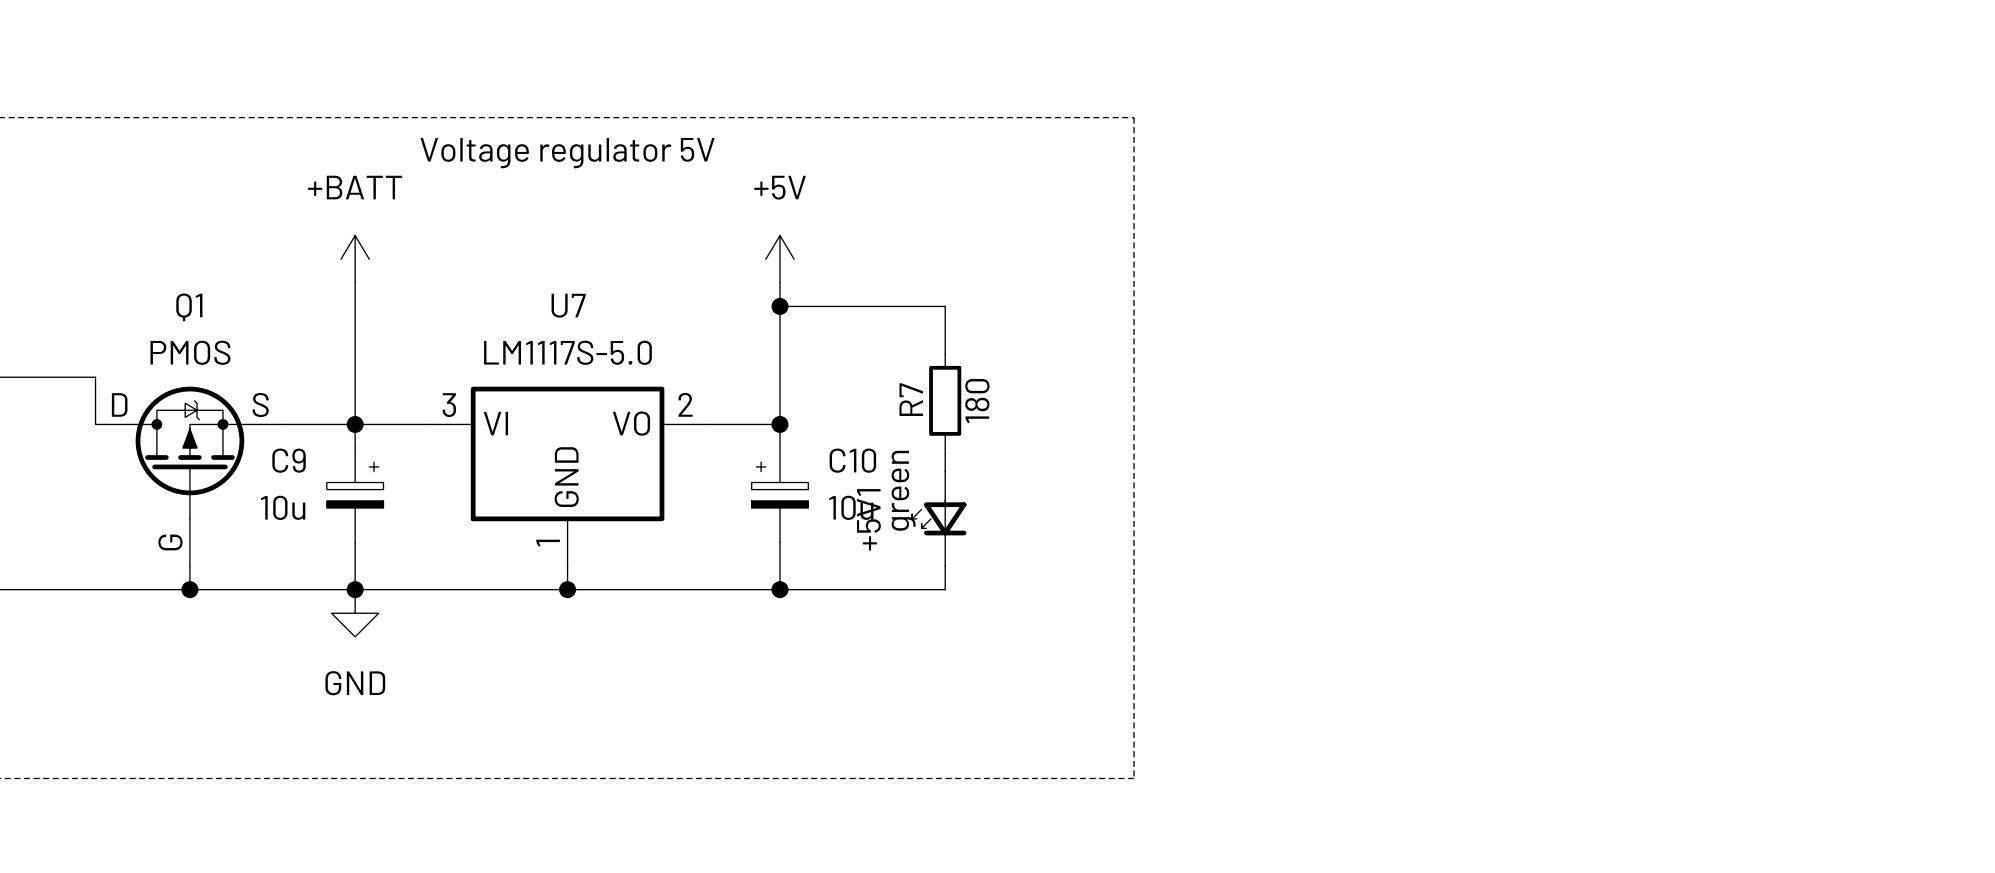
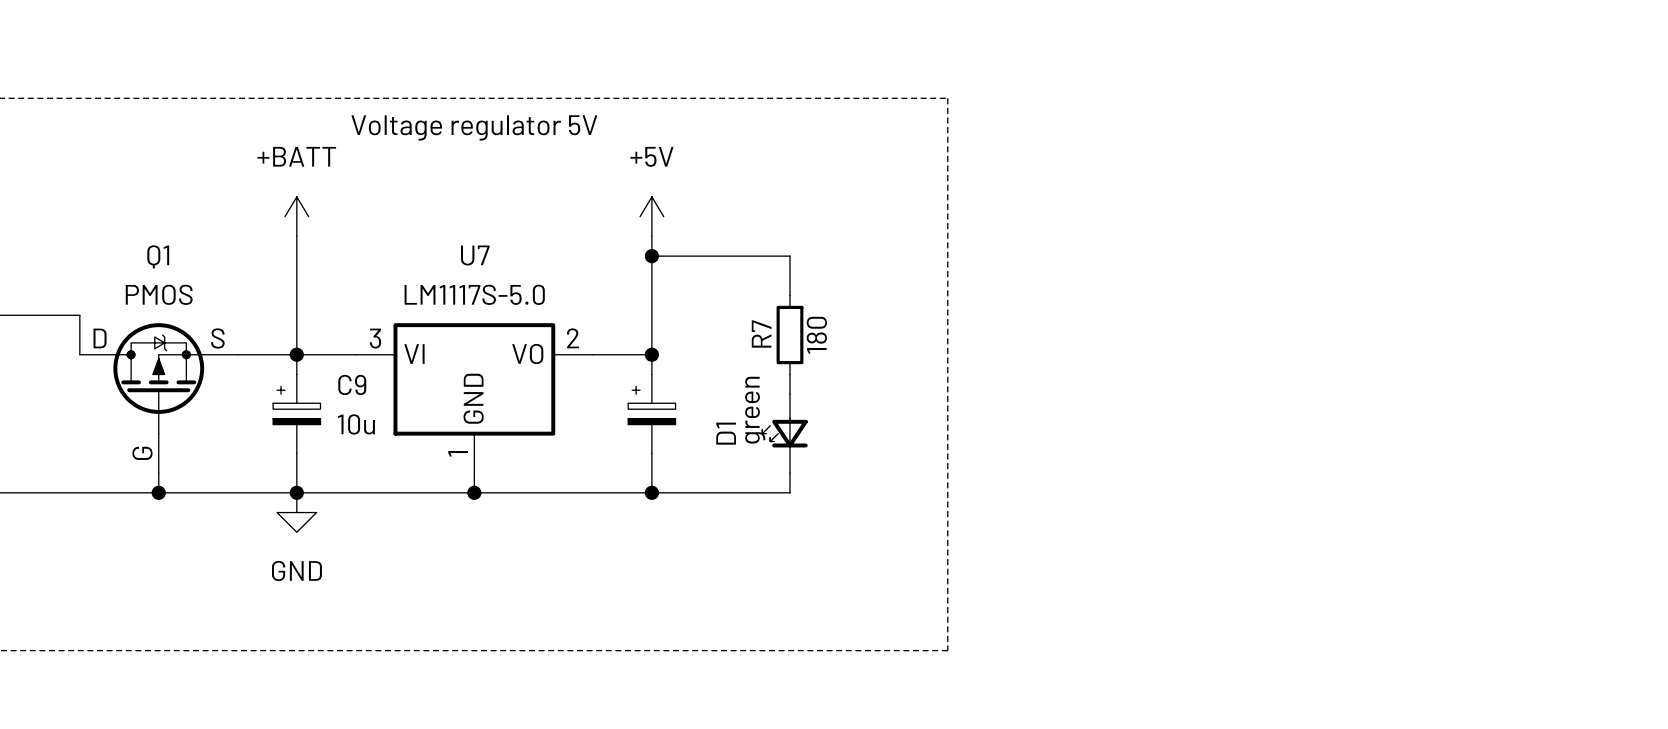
C10 name: C10 (852, 460) -> none
C9 flip: as is (355, 485) -> left-right (296, 405)
C10 value: 10u (851, 507) -> none
+5V1 name: +5V1 (868, 519) -> D1 (726, 433)

